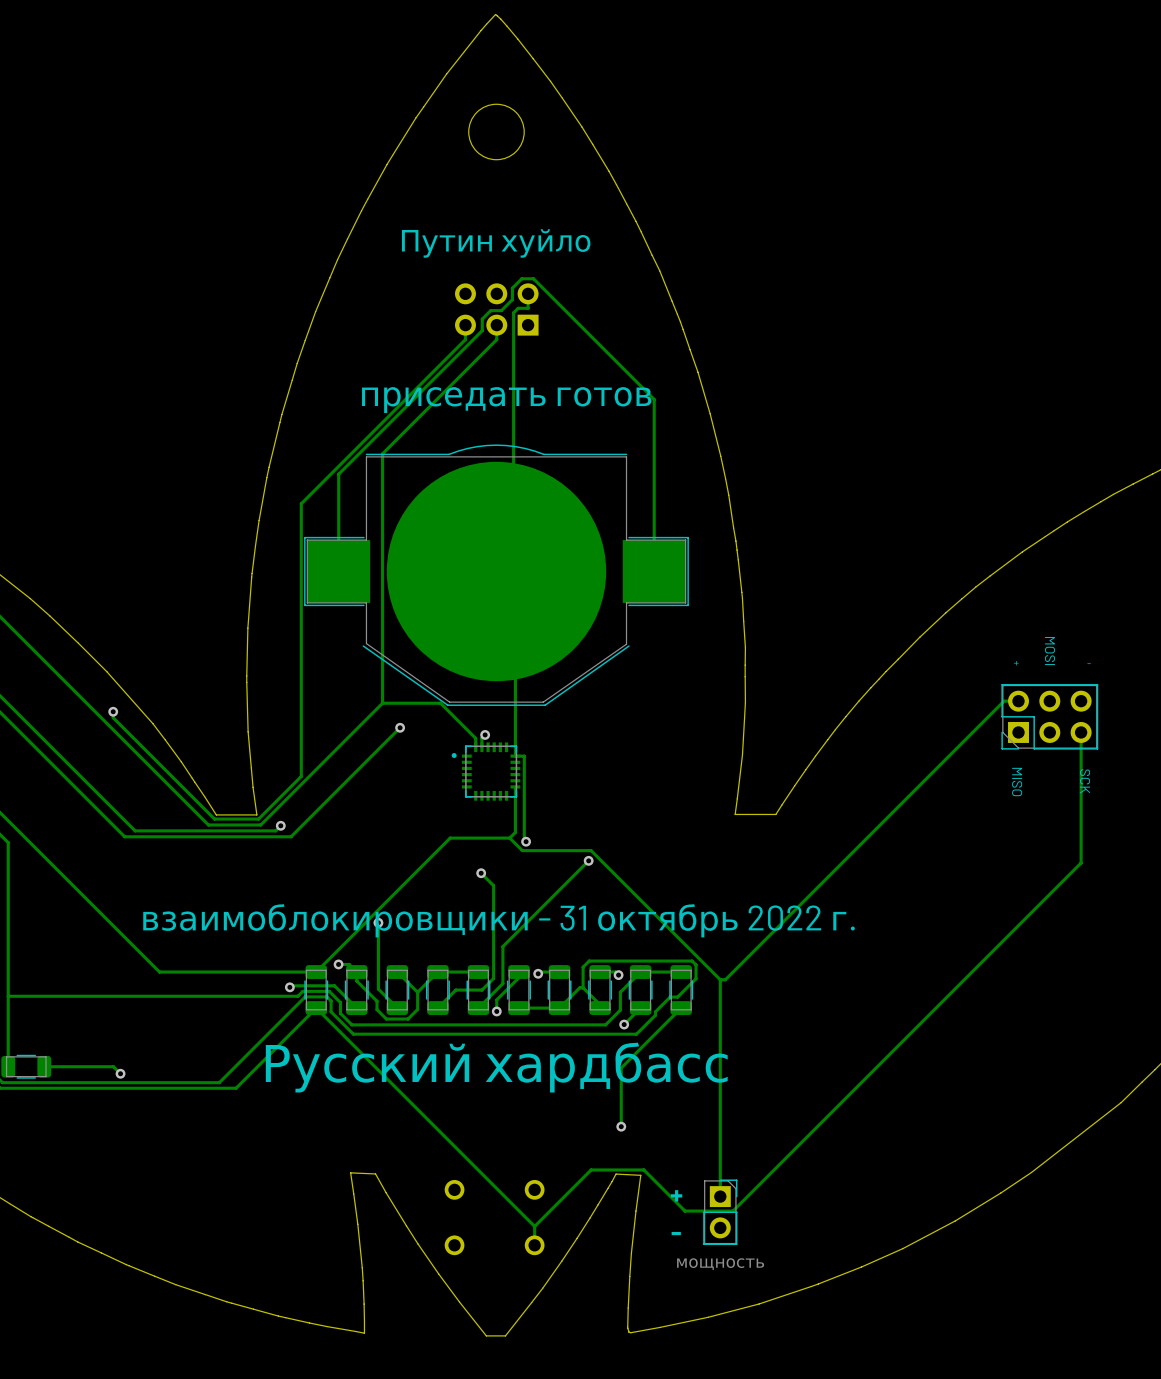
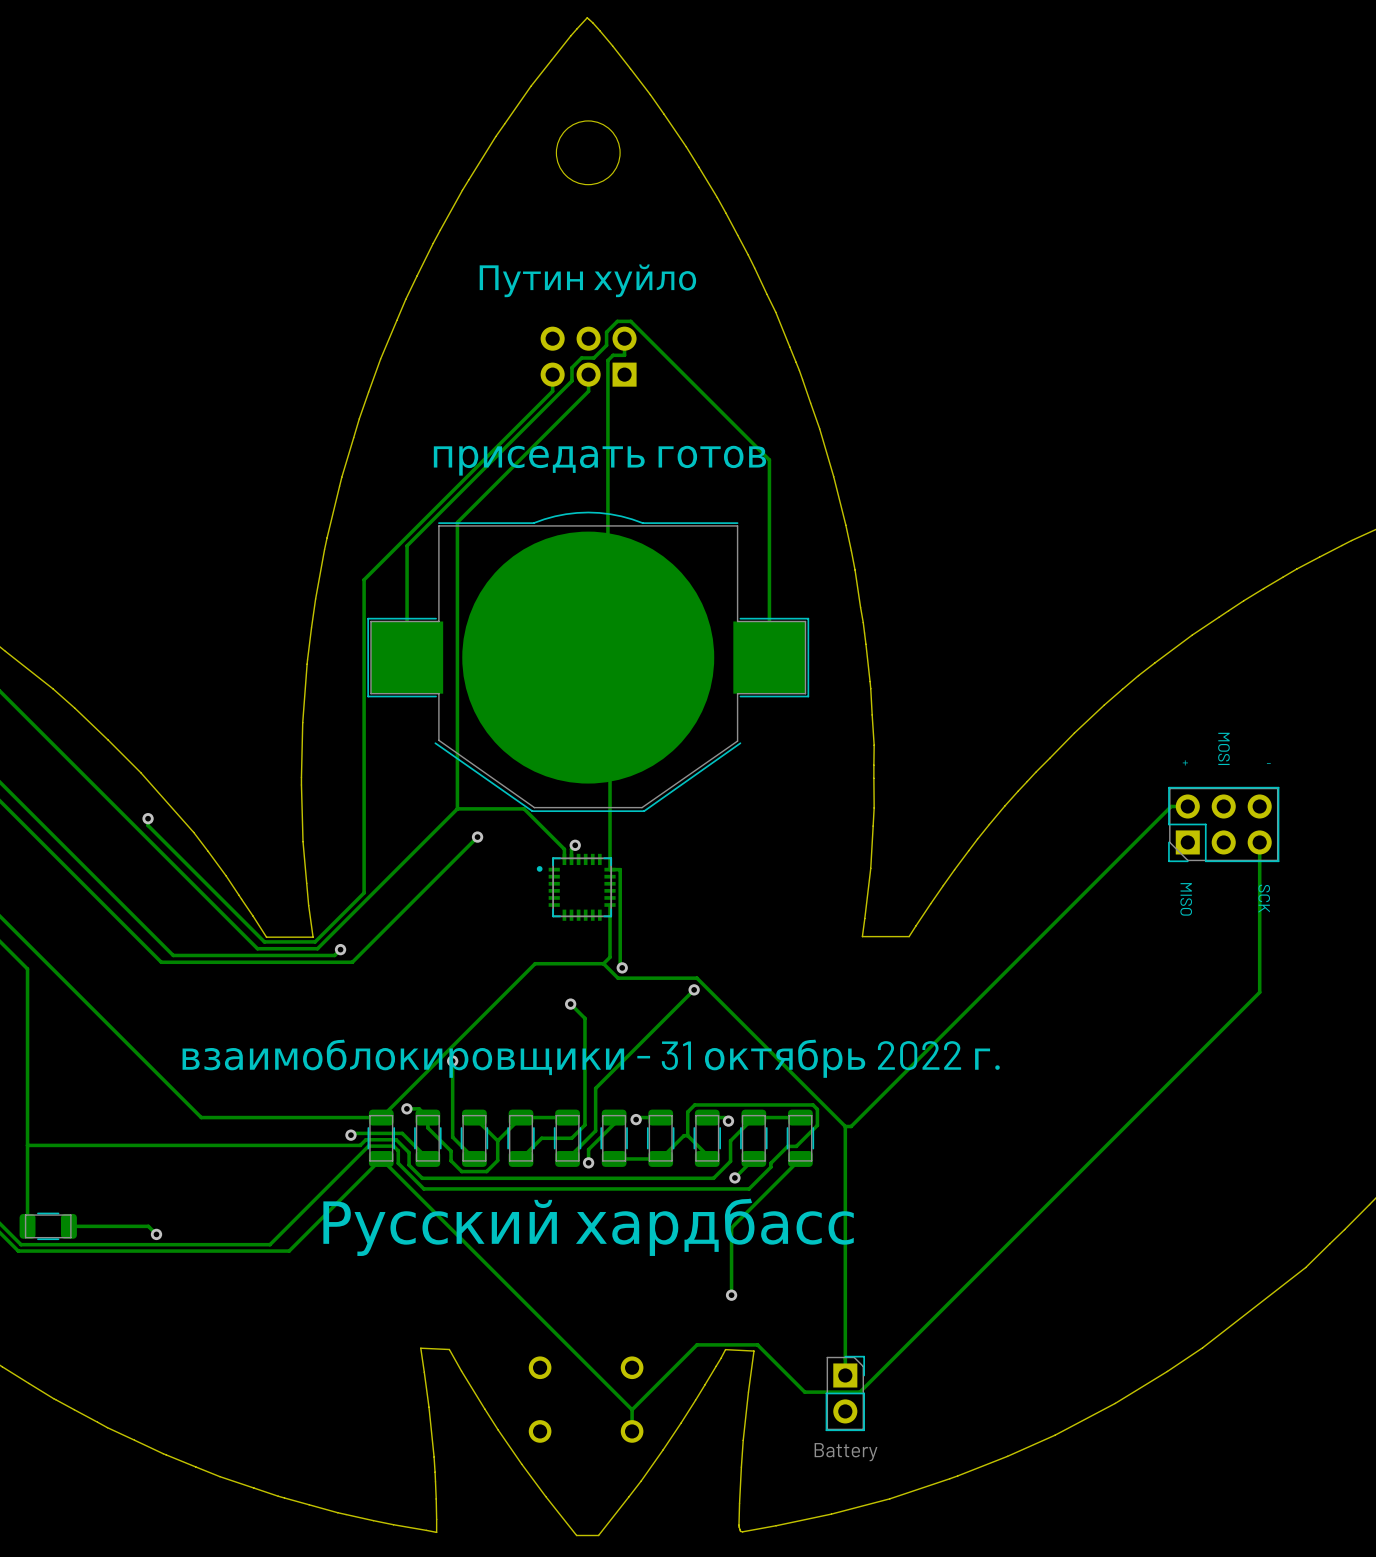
text: + (676, 1195) -> none
text: - (676, 1233) -> none
part value: мощность (720, 1264) -> Battery (846, 1452)

